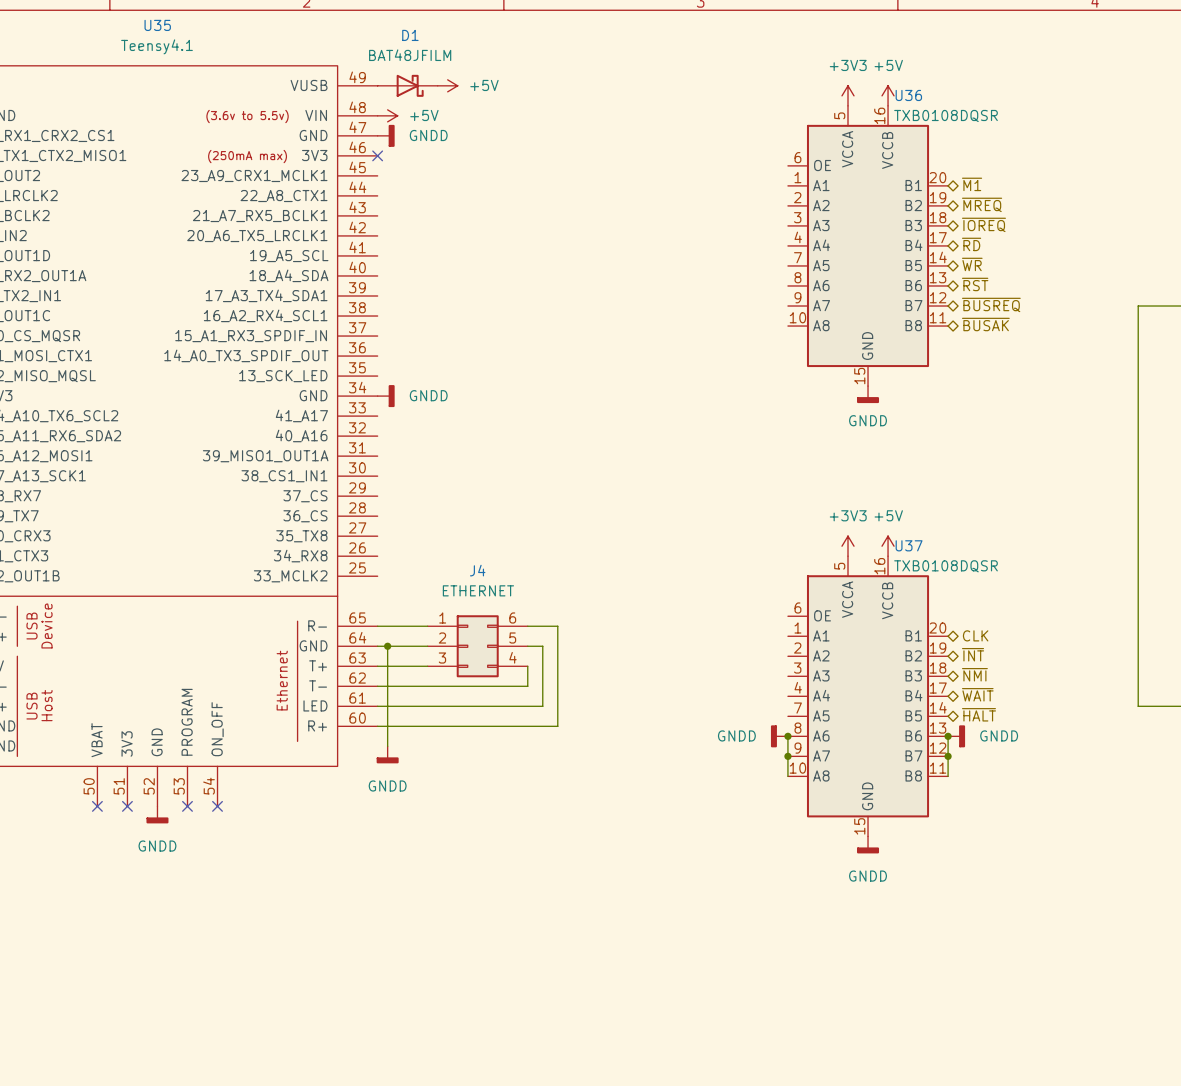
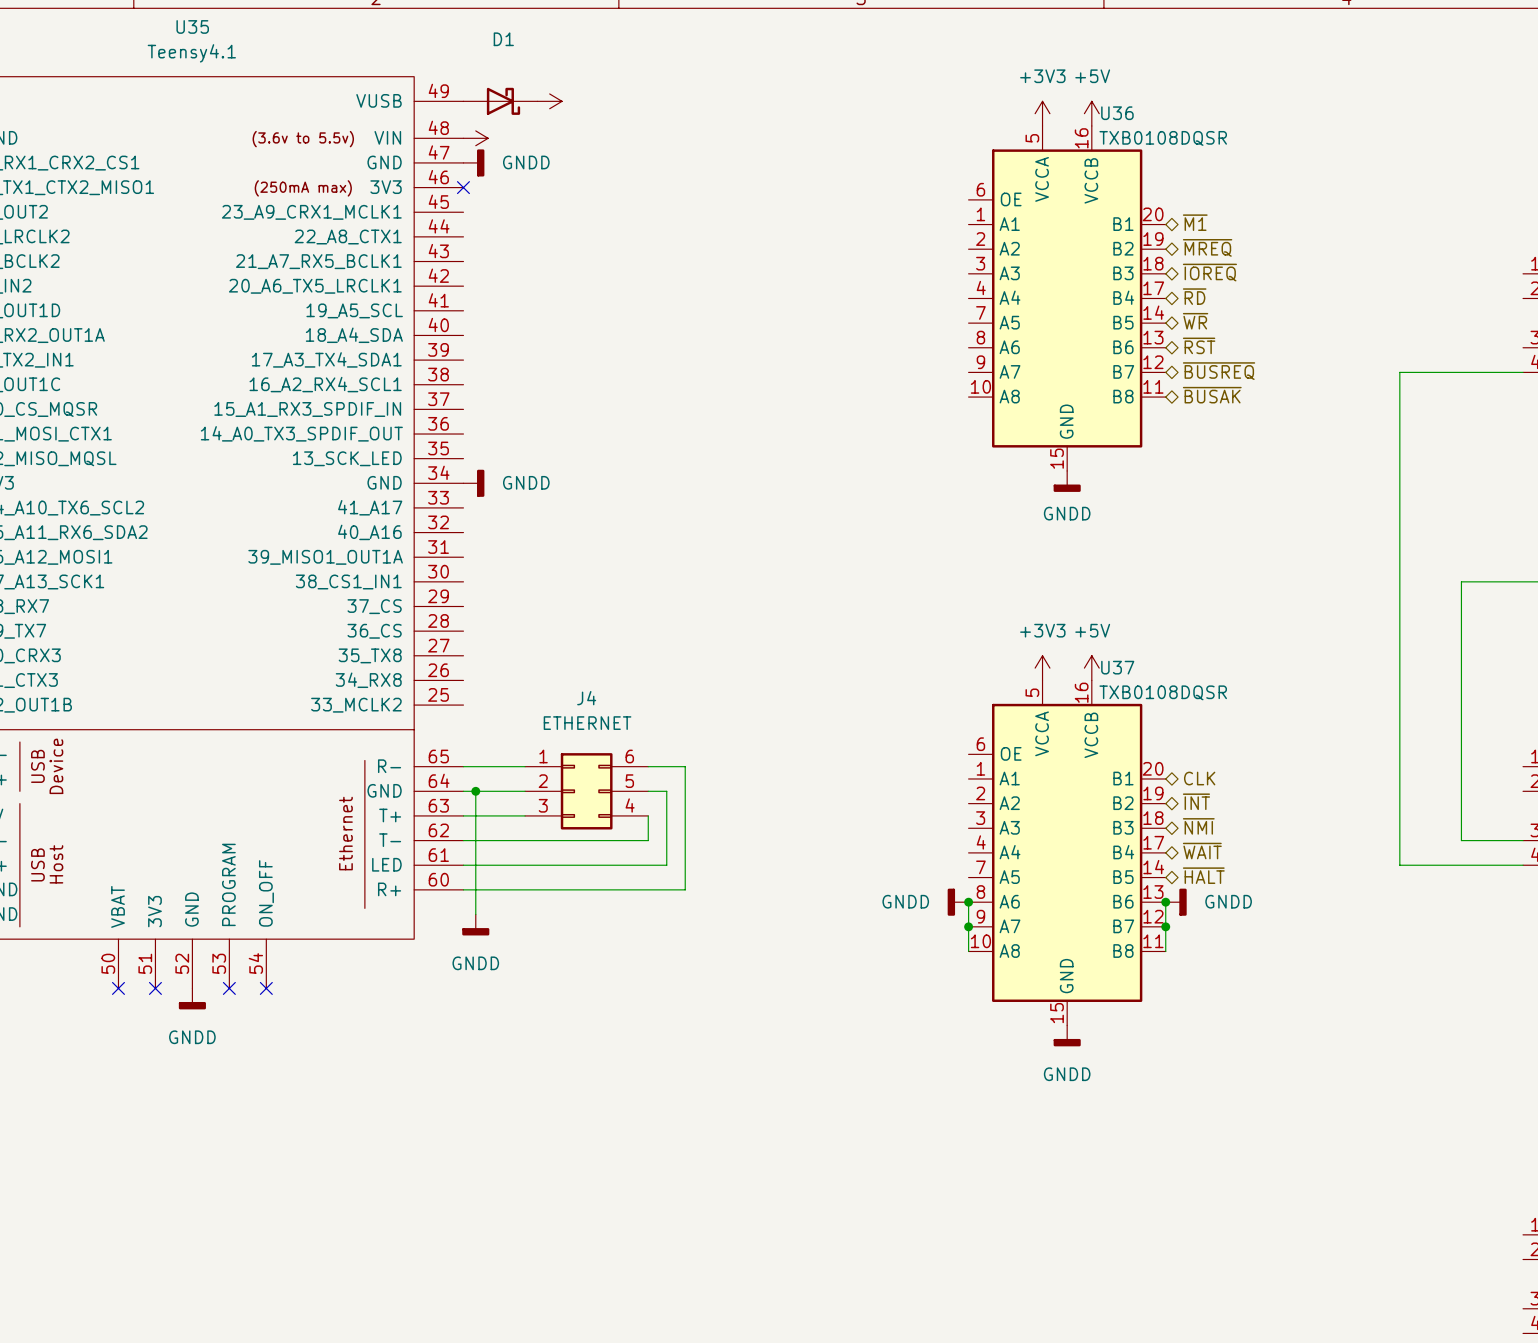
D1 value: BAT48JFILM (410, 55) -> none
power symbol text: +5V (484, 85) -> none
power symbol text: +5V (424, 115) -> none

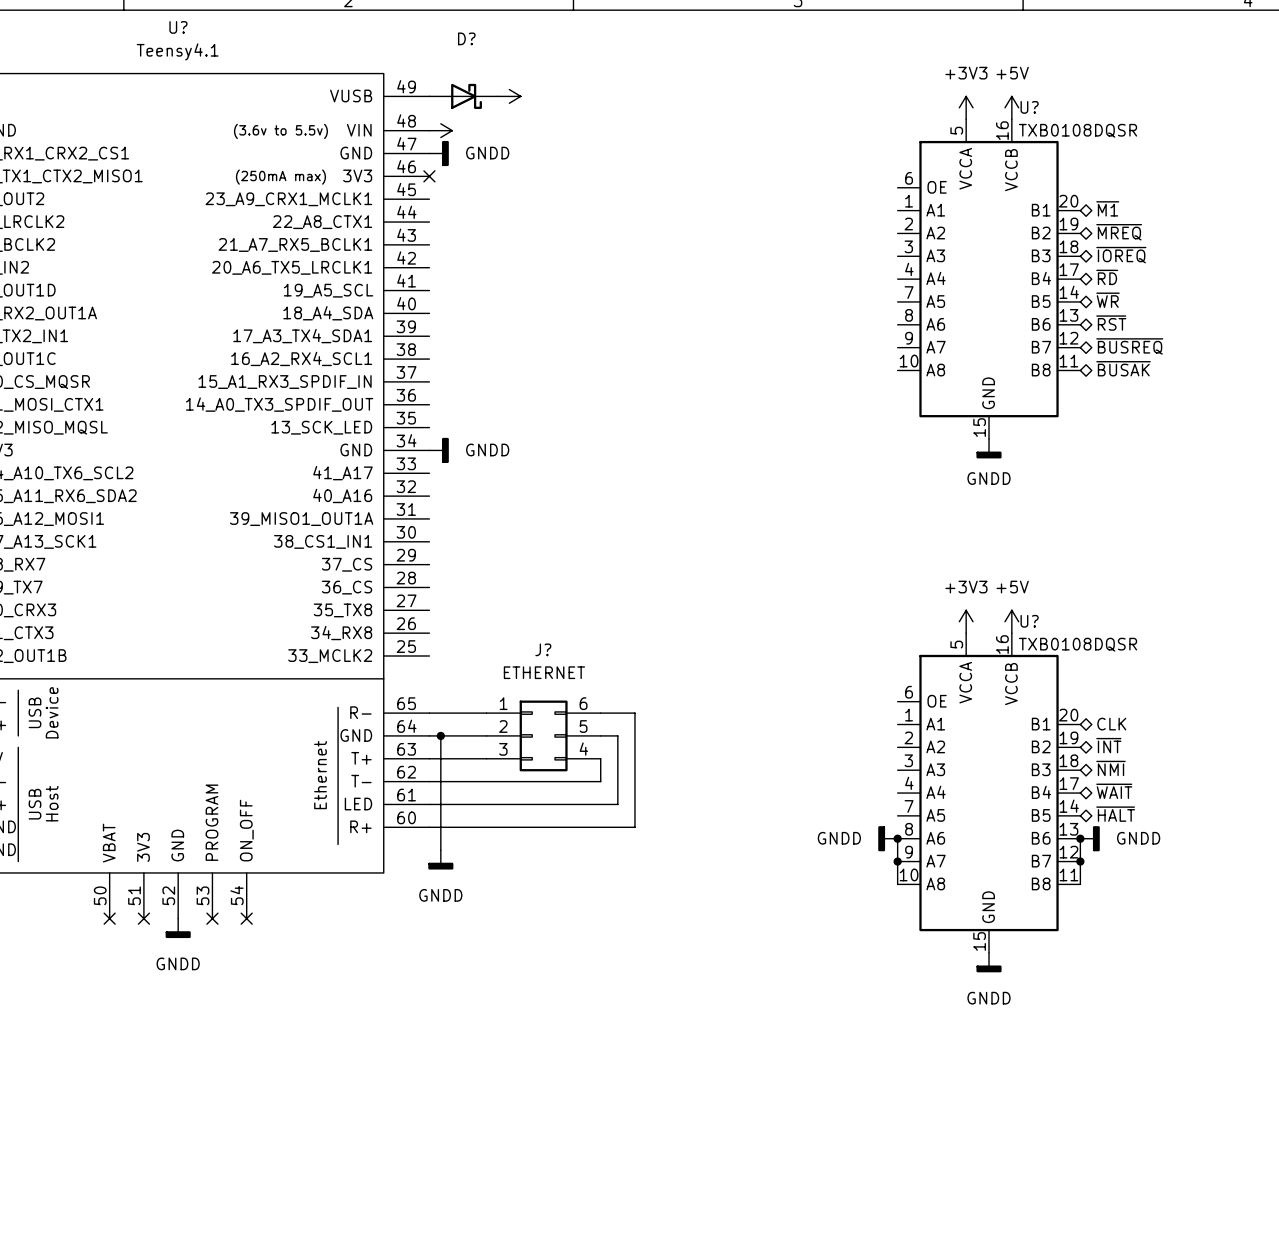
U35 name: U35 (192, 26) -> U? (178, 27)
D1 name: D1 (503, 39) -> D? (466, 38)
U36 name: U36 (1117, 113) -> U? (1029, 107)
U37 name: U37 (1117, 667) -> U? (1029, 621)
J4 name: J4 (586, 698) -> J? (543, 649)

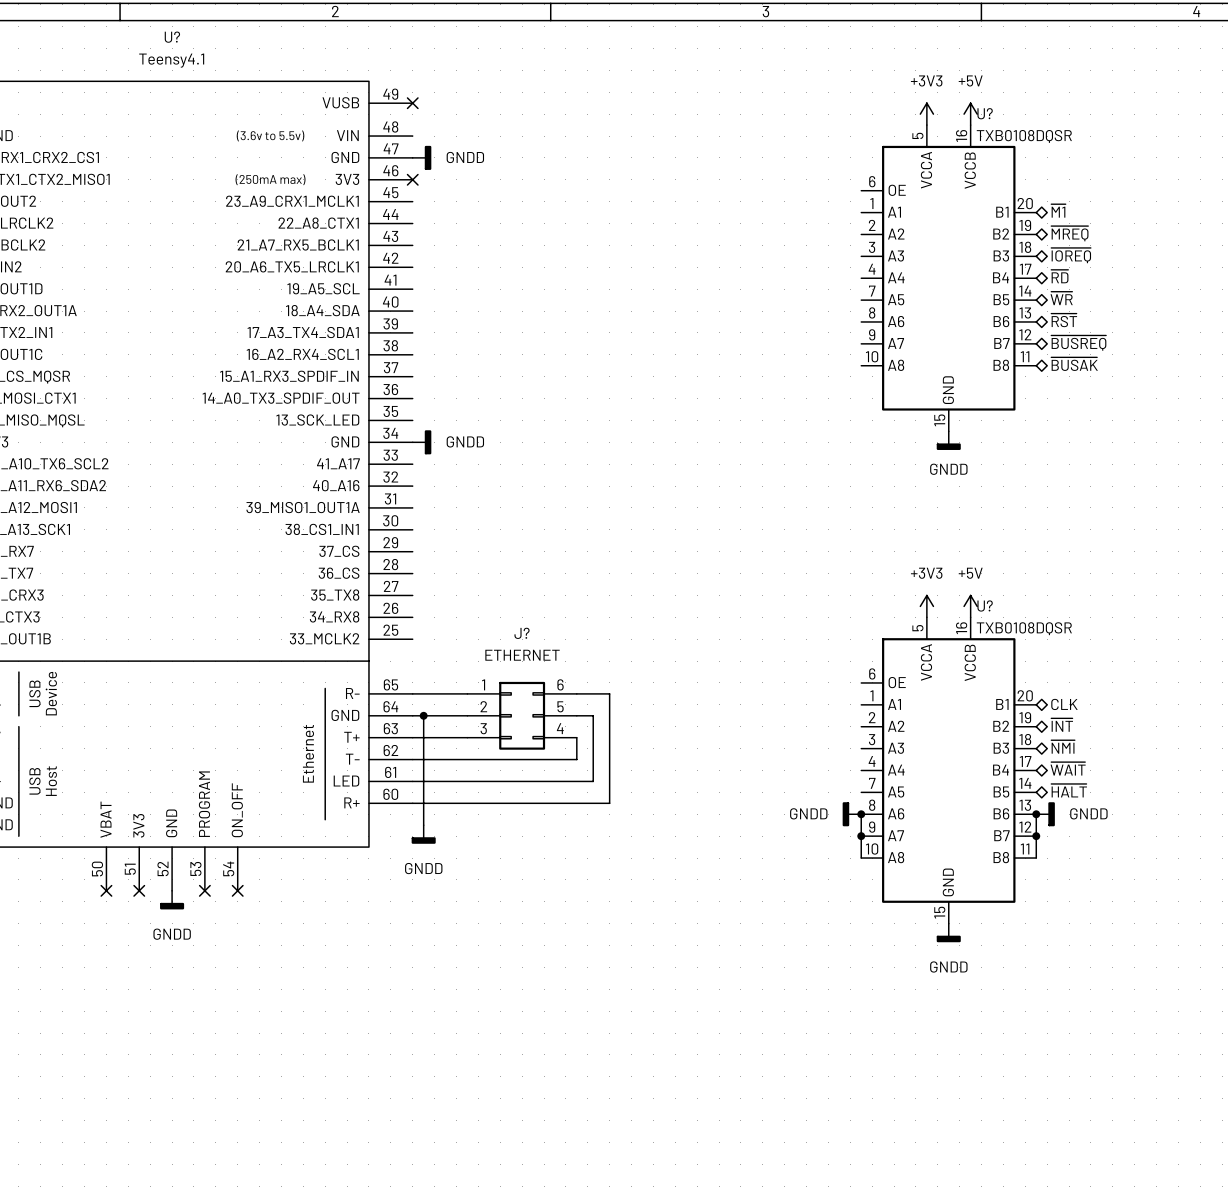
no-connect mark: none -> (412, 103)
D?: (463, 96) -> none
power symbol: (509, 96) -> none
power symbol: (440, 130) -> none

